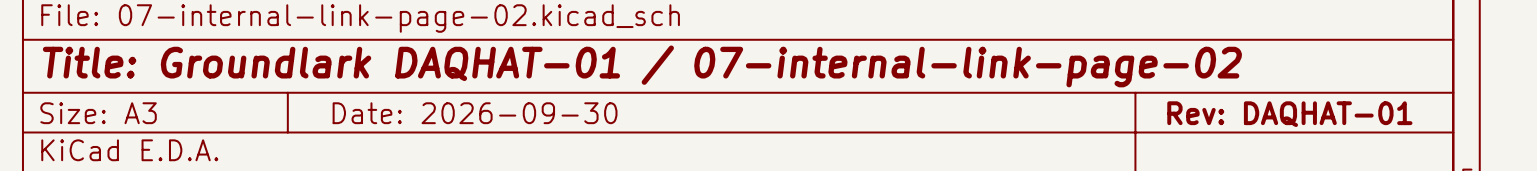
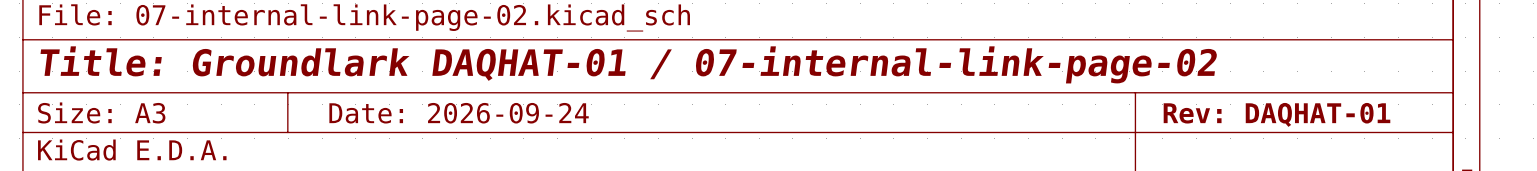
title block: Date: 2026-09-30 (475, 113) -> Date: 2026-09-24 (459, 113)

